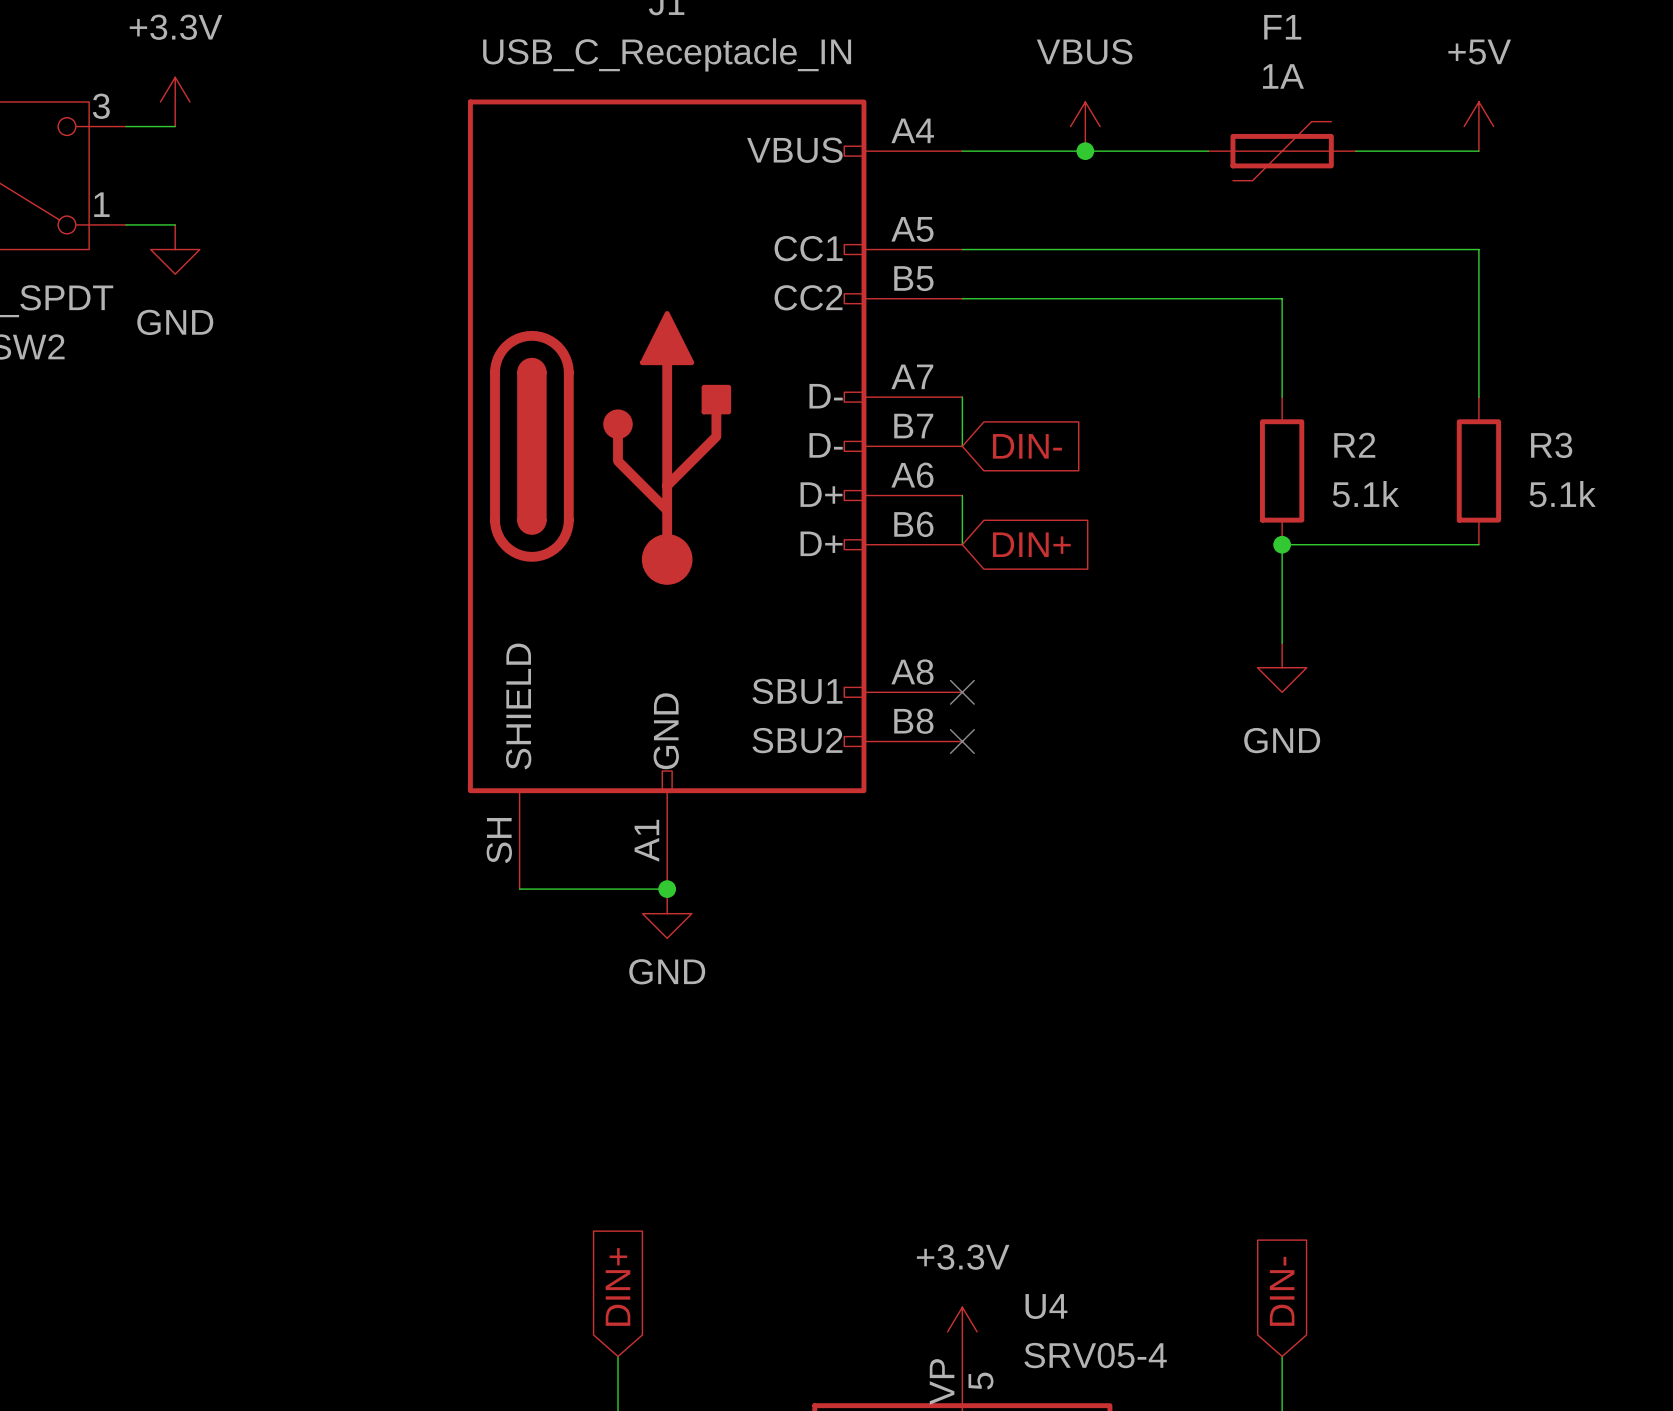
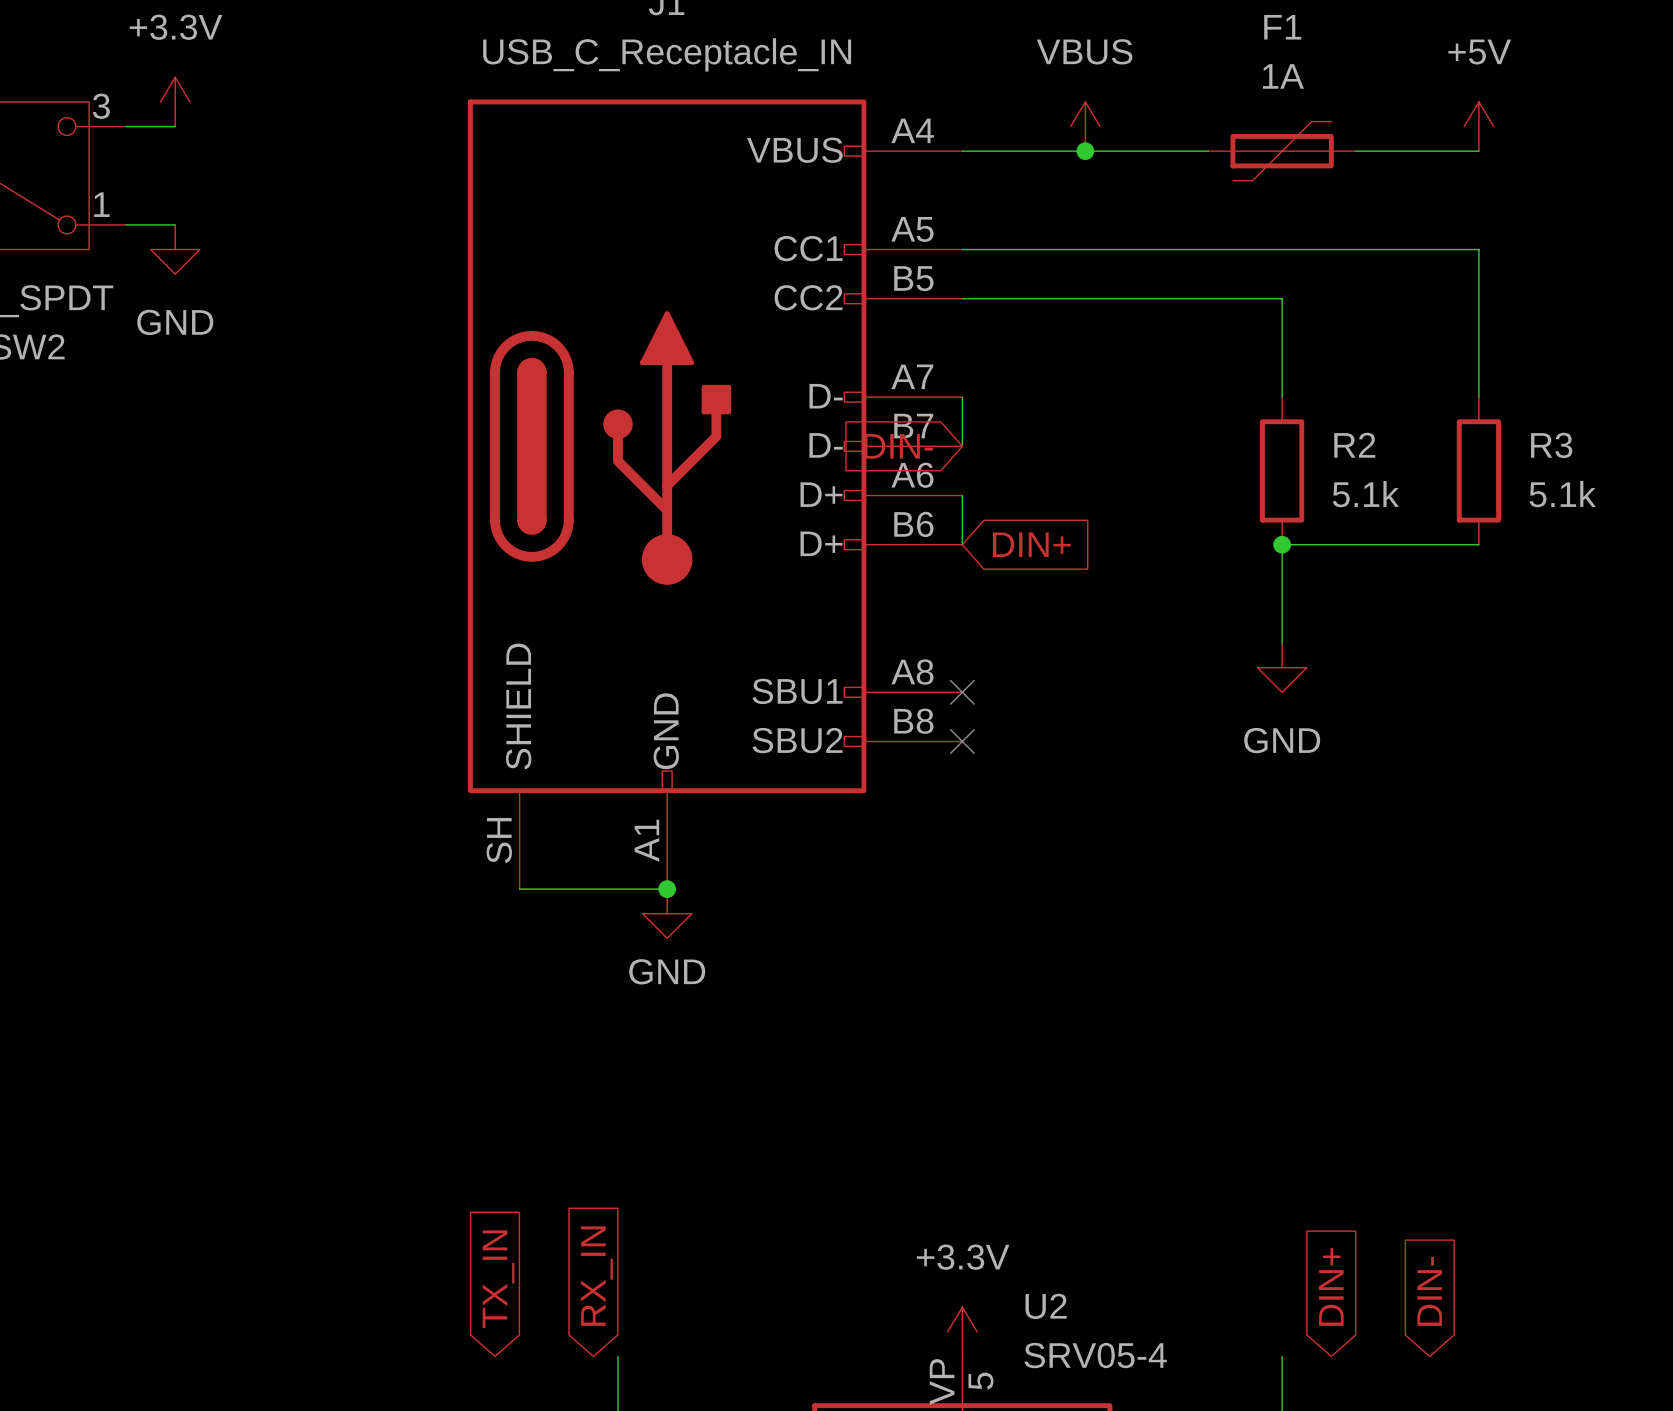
global label rotation: 0° (1027, 446) -> 180° (898, 446)
global label: none -> RX_IN (596, 1276)
global label: none -> TX_IN (498, 1279)
global label: DIN+ (617, 1286) -> none
global label: none -> DIN+ (1331, 1286)
global label position: DIN- (1282, 1291) -> DIN- (1429, 1291)
U4 name: U4 (1046, 1306) -> U2 (1046, 1306)

